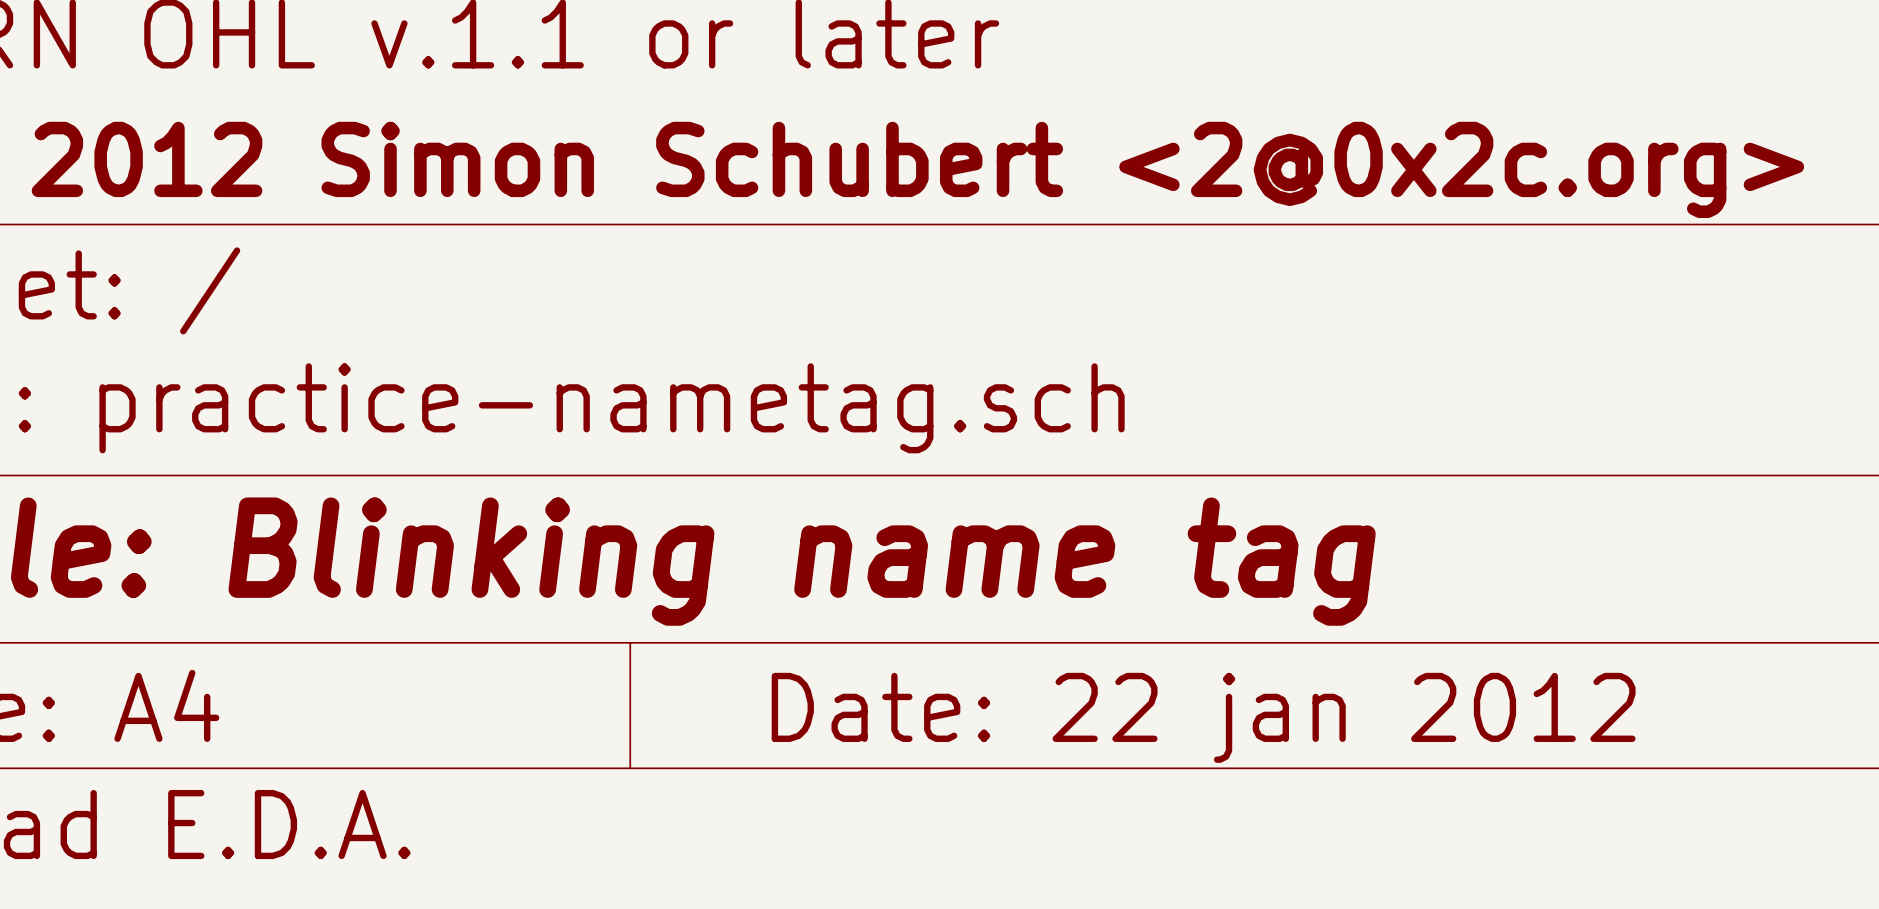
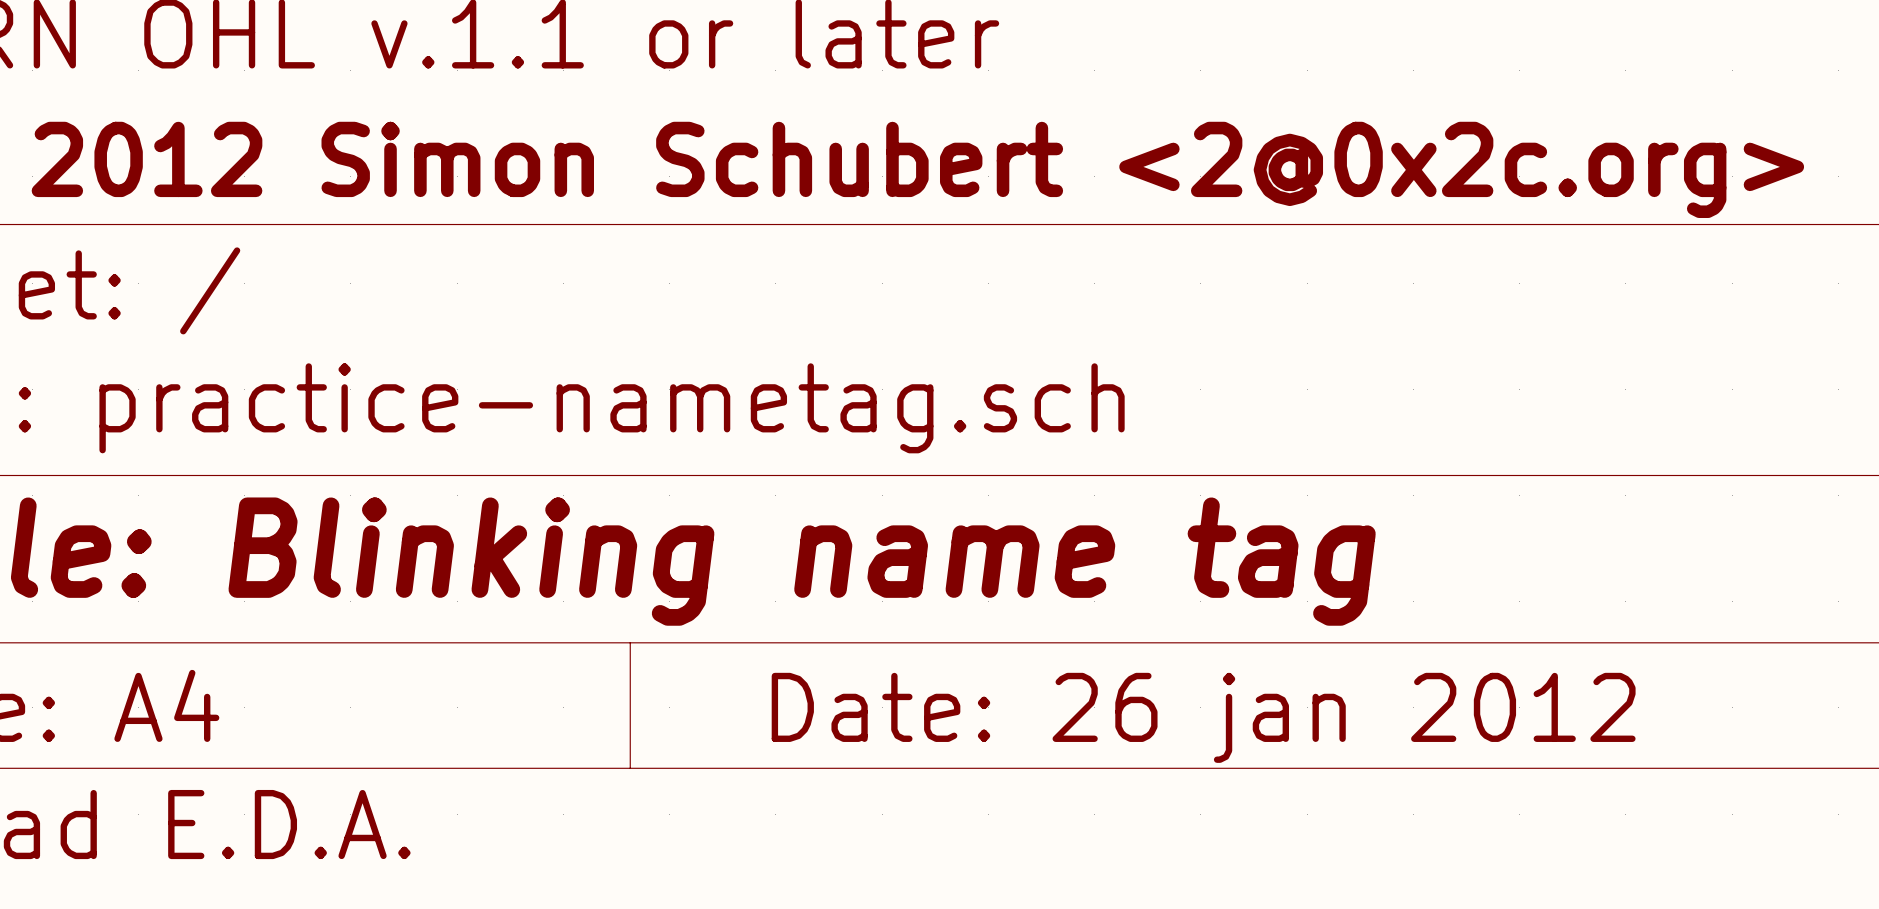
title block: Date: 22 jan 2012 (1203, 717) -> Date: 26 jan 2012 (1203, 717)

